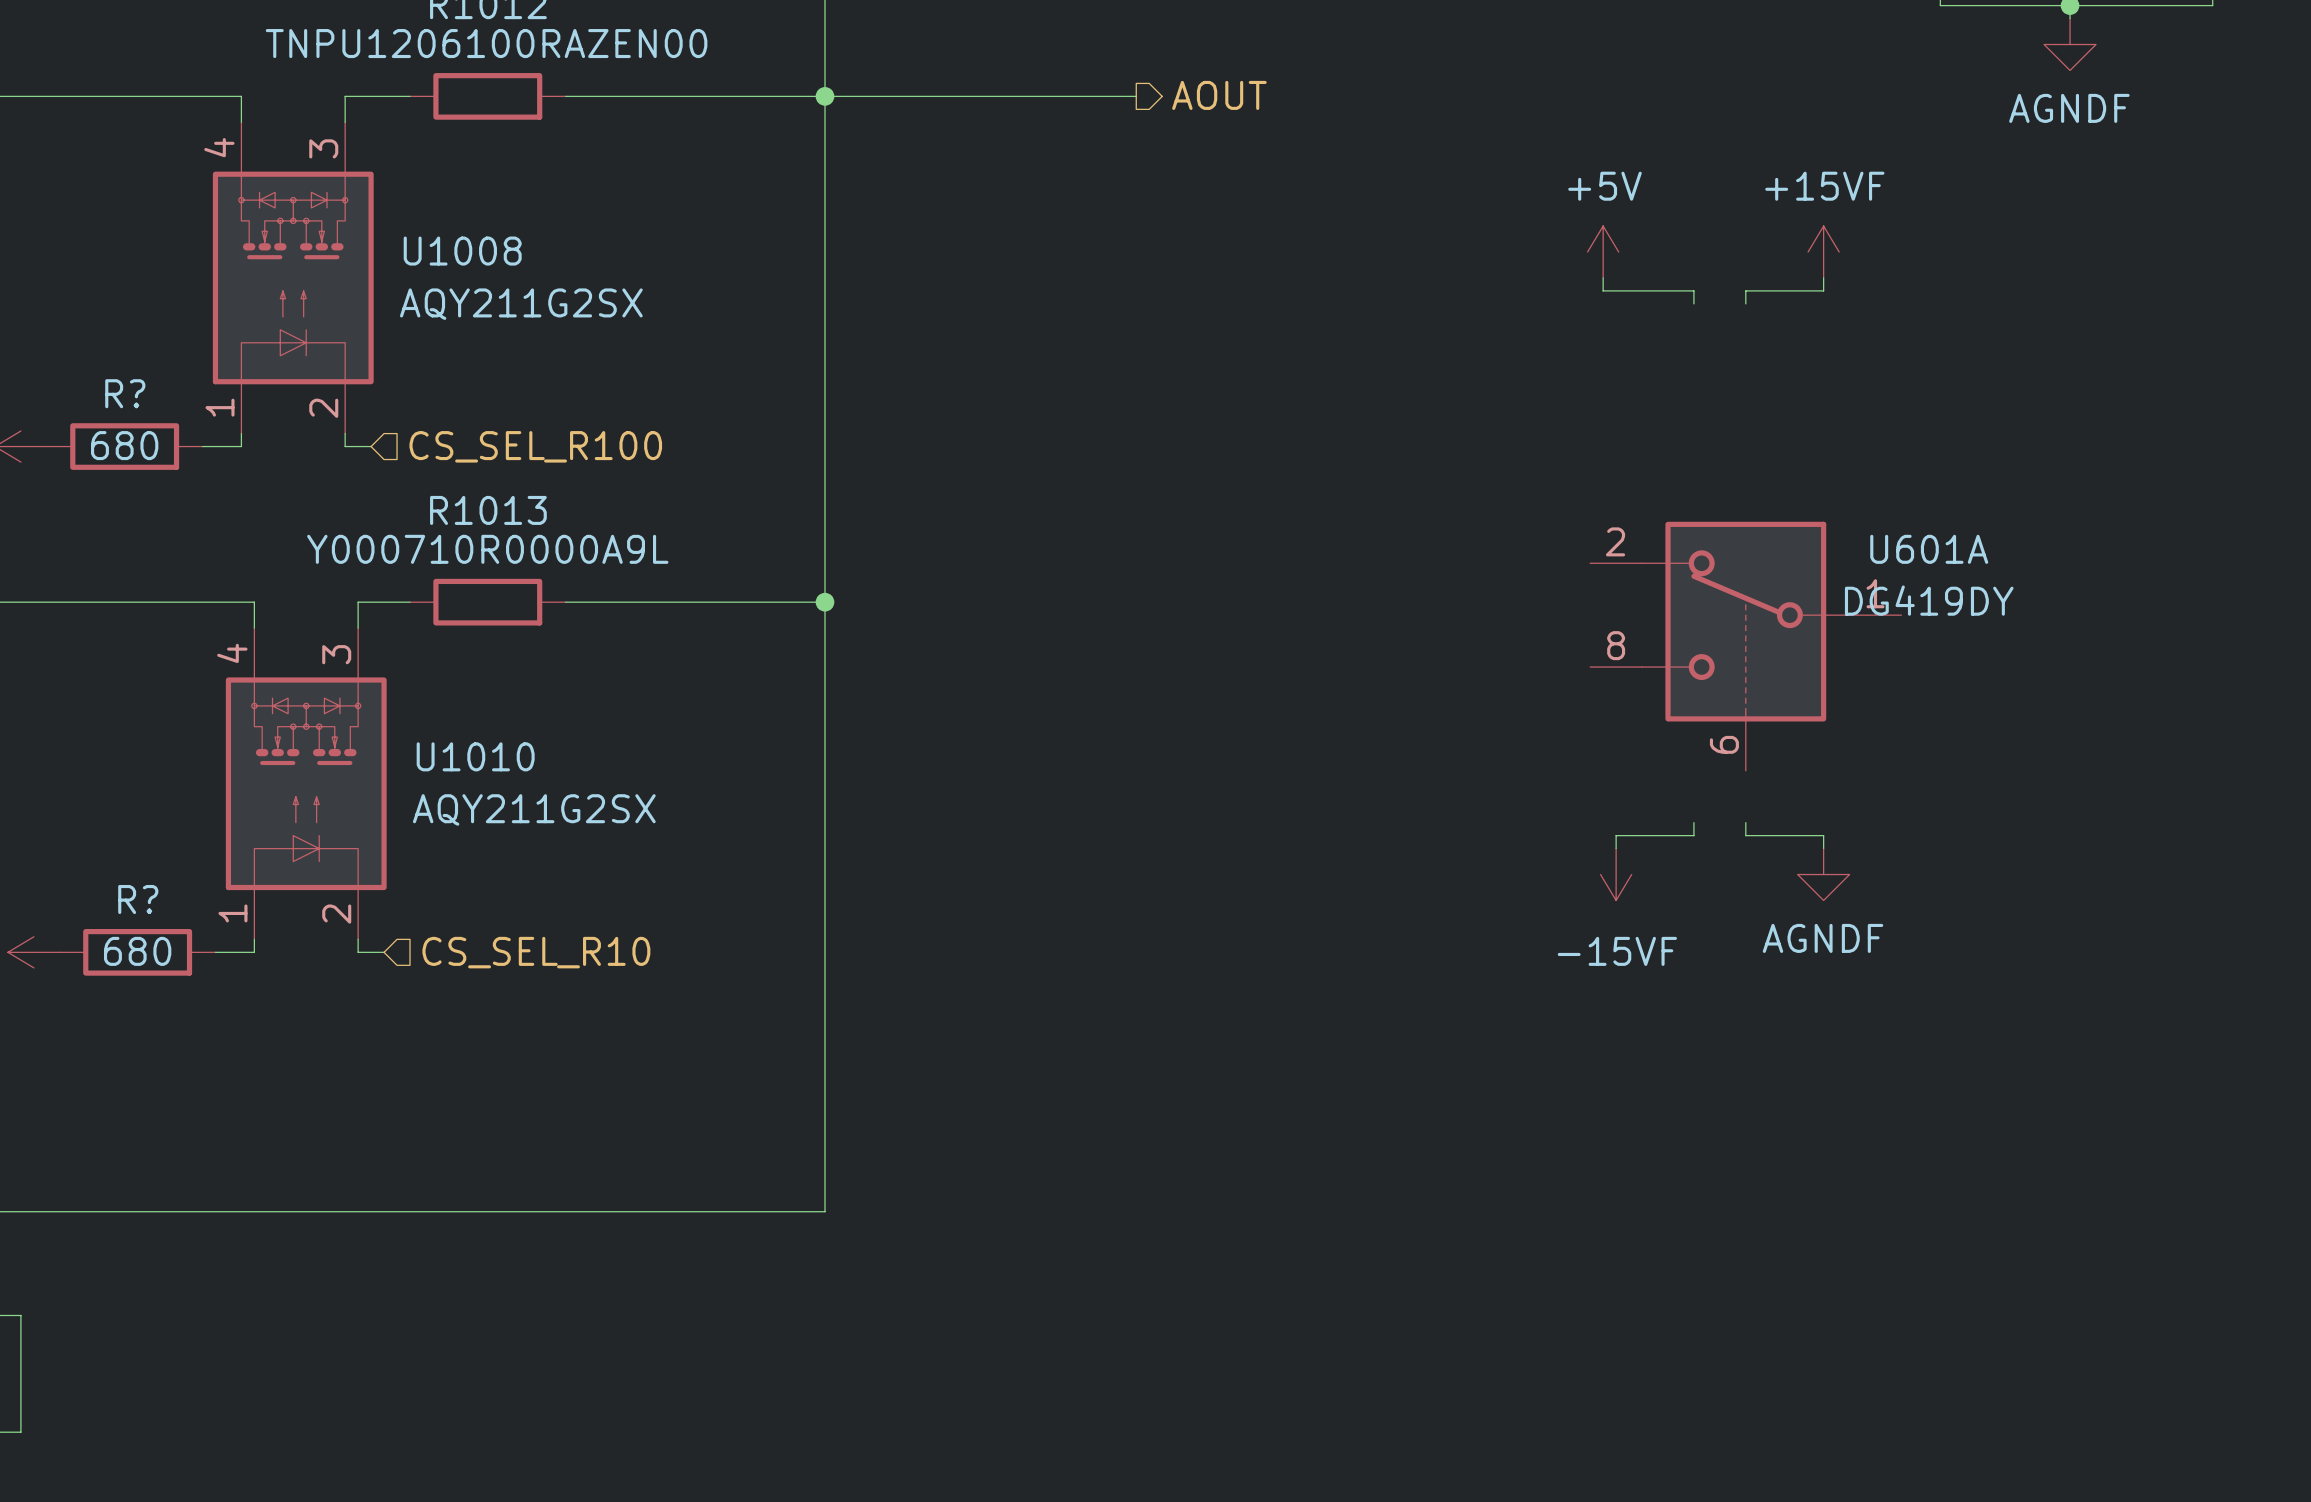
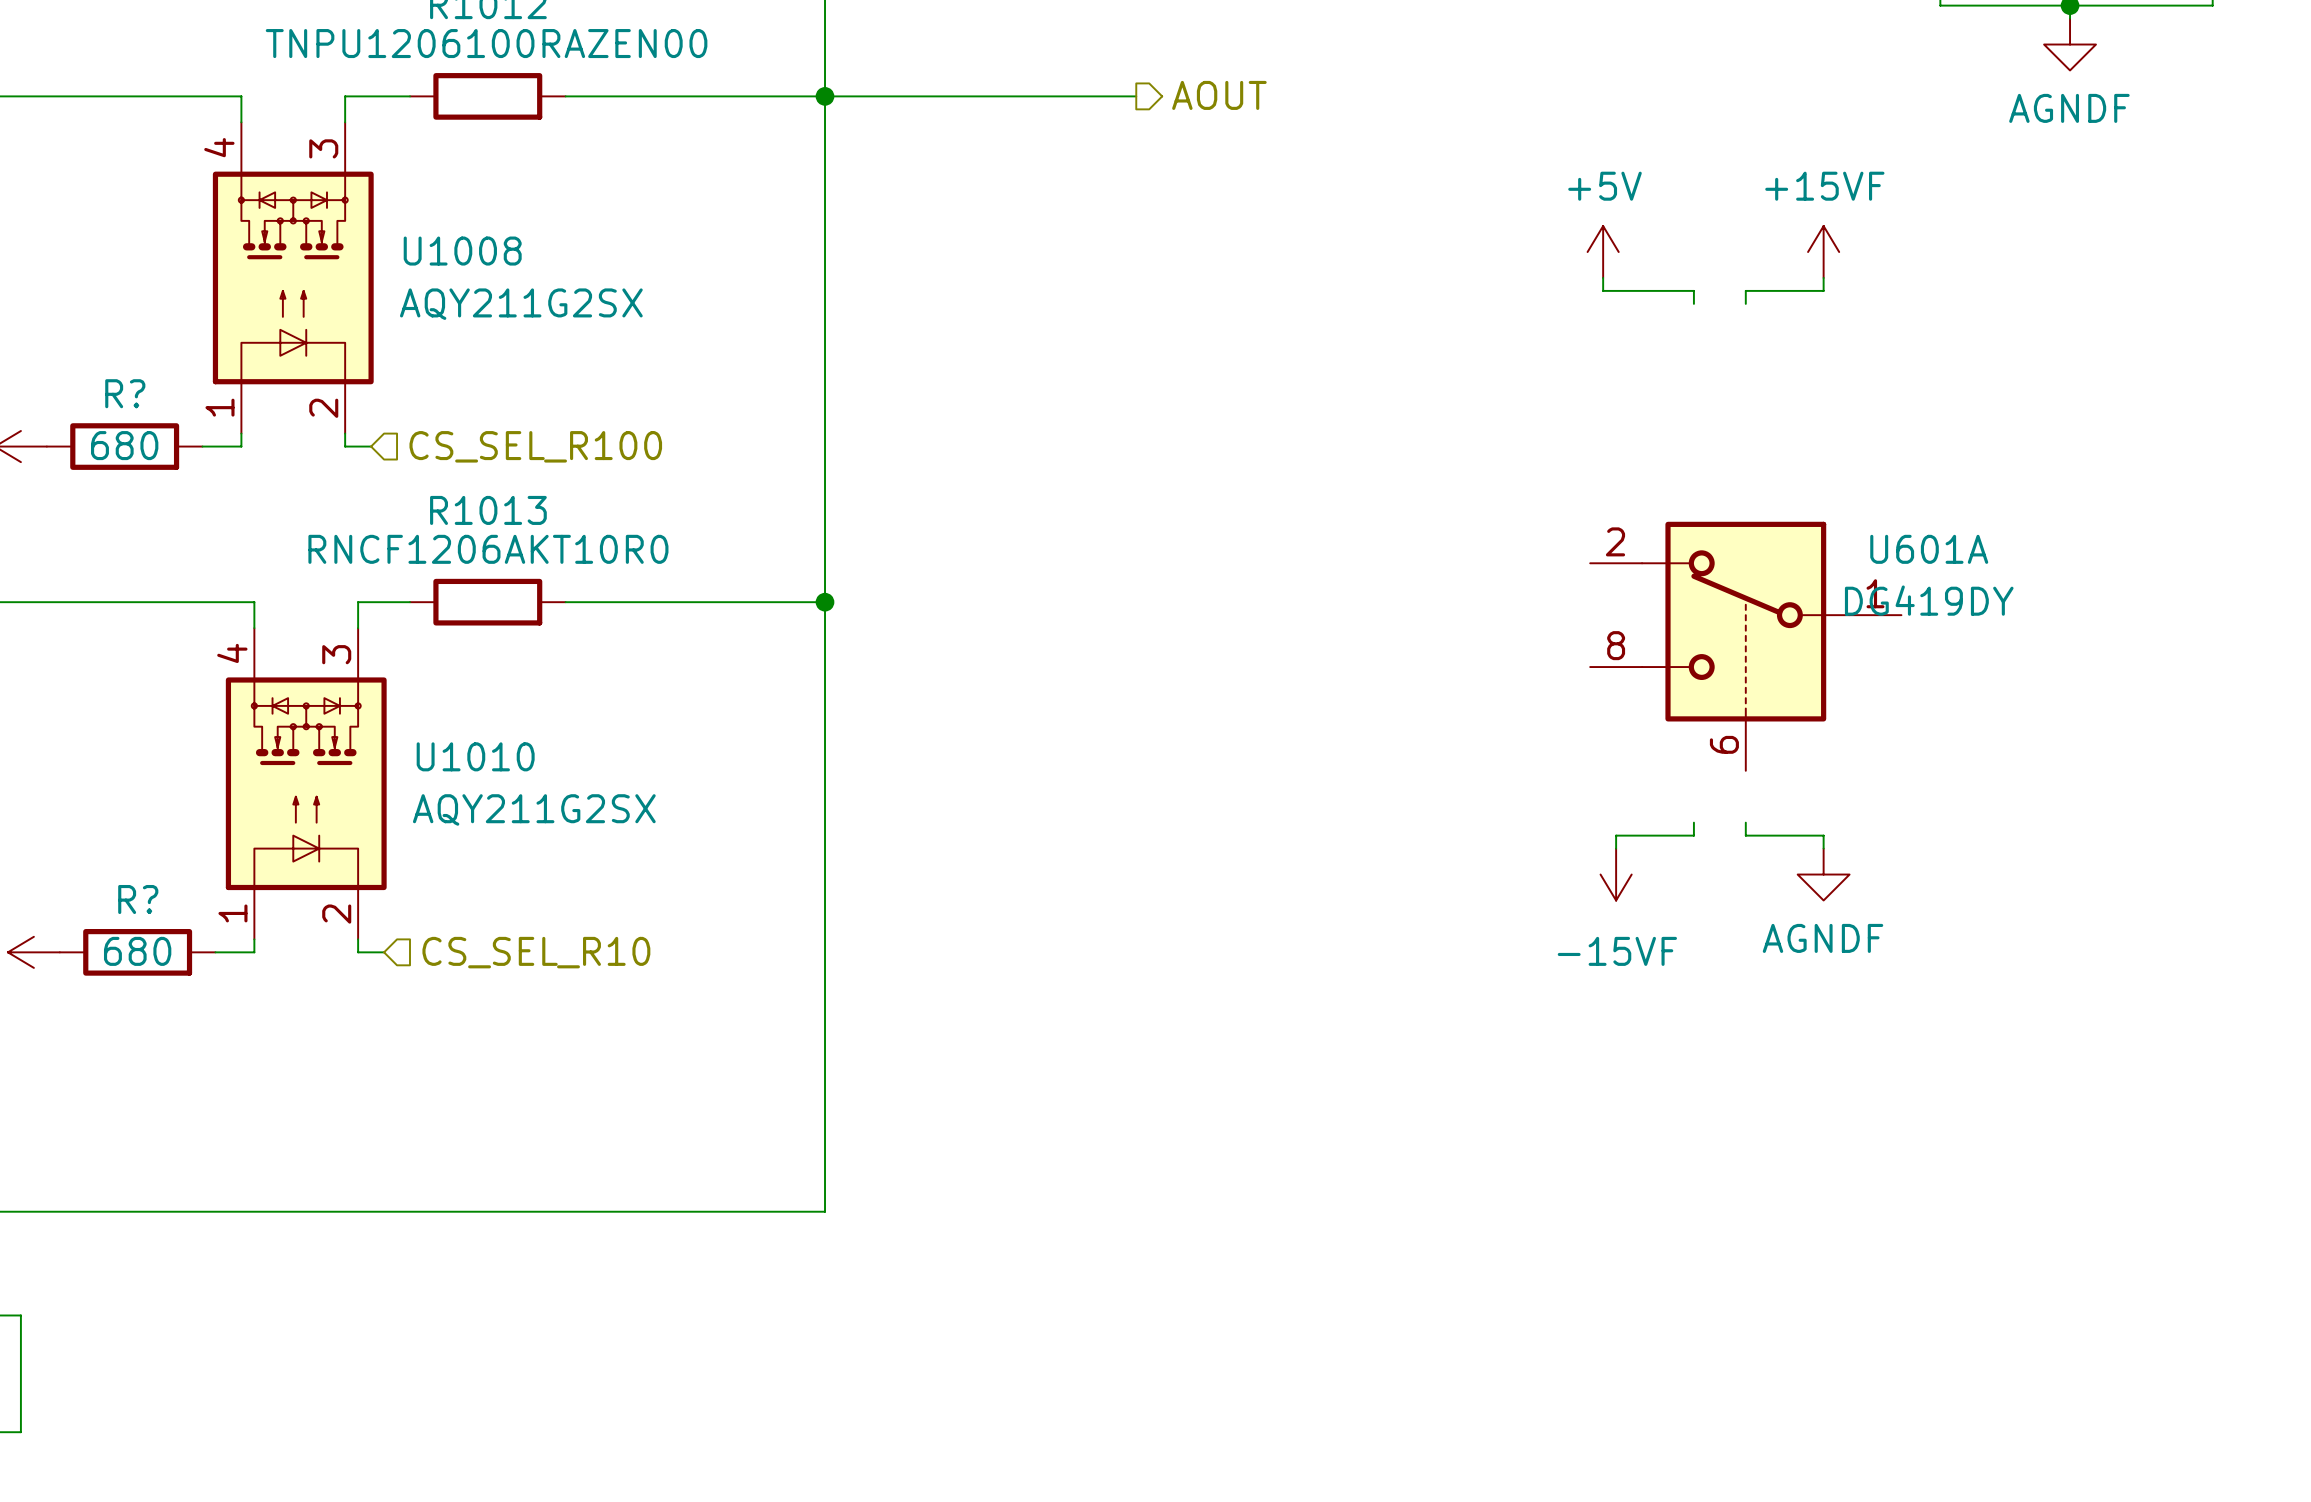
R1013 value: Y000710R0000A9L (487, 549) -> RNCF1206AKT10R0 (488, 549)

